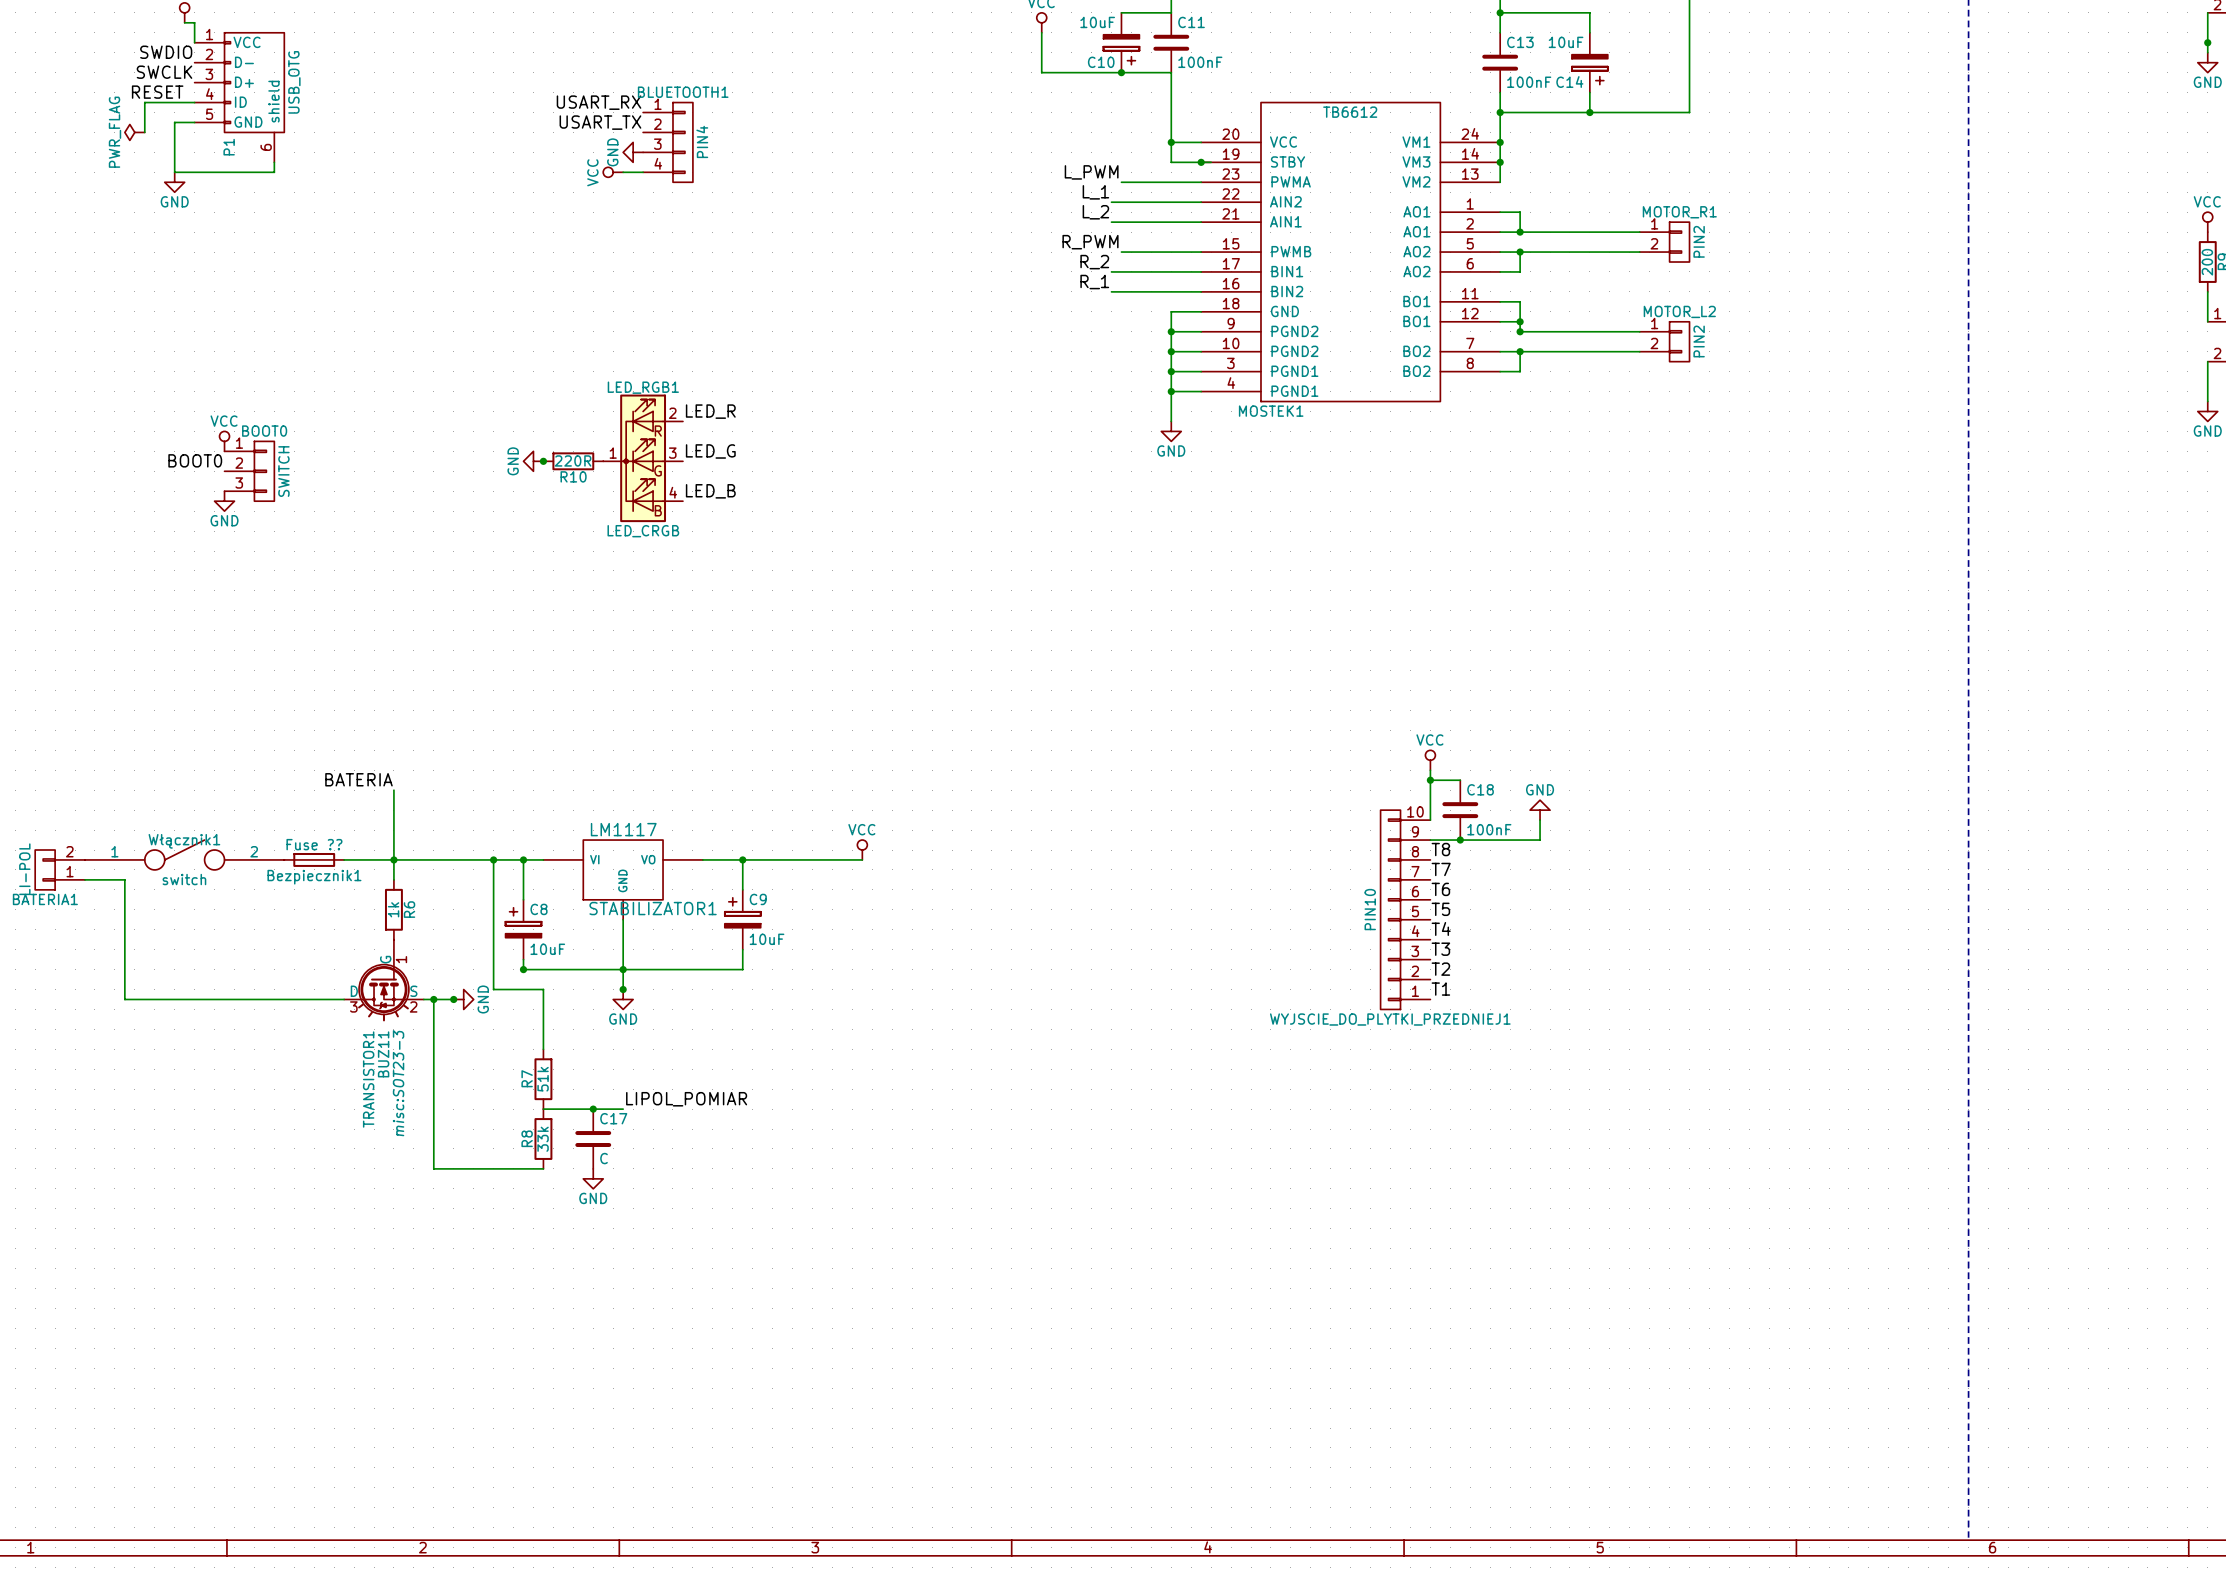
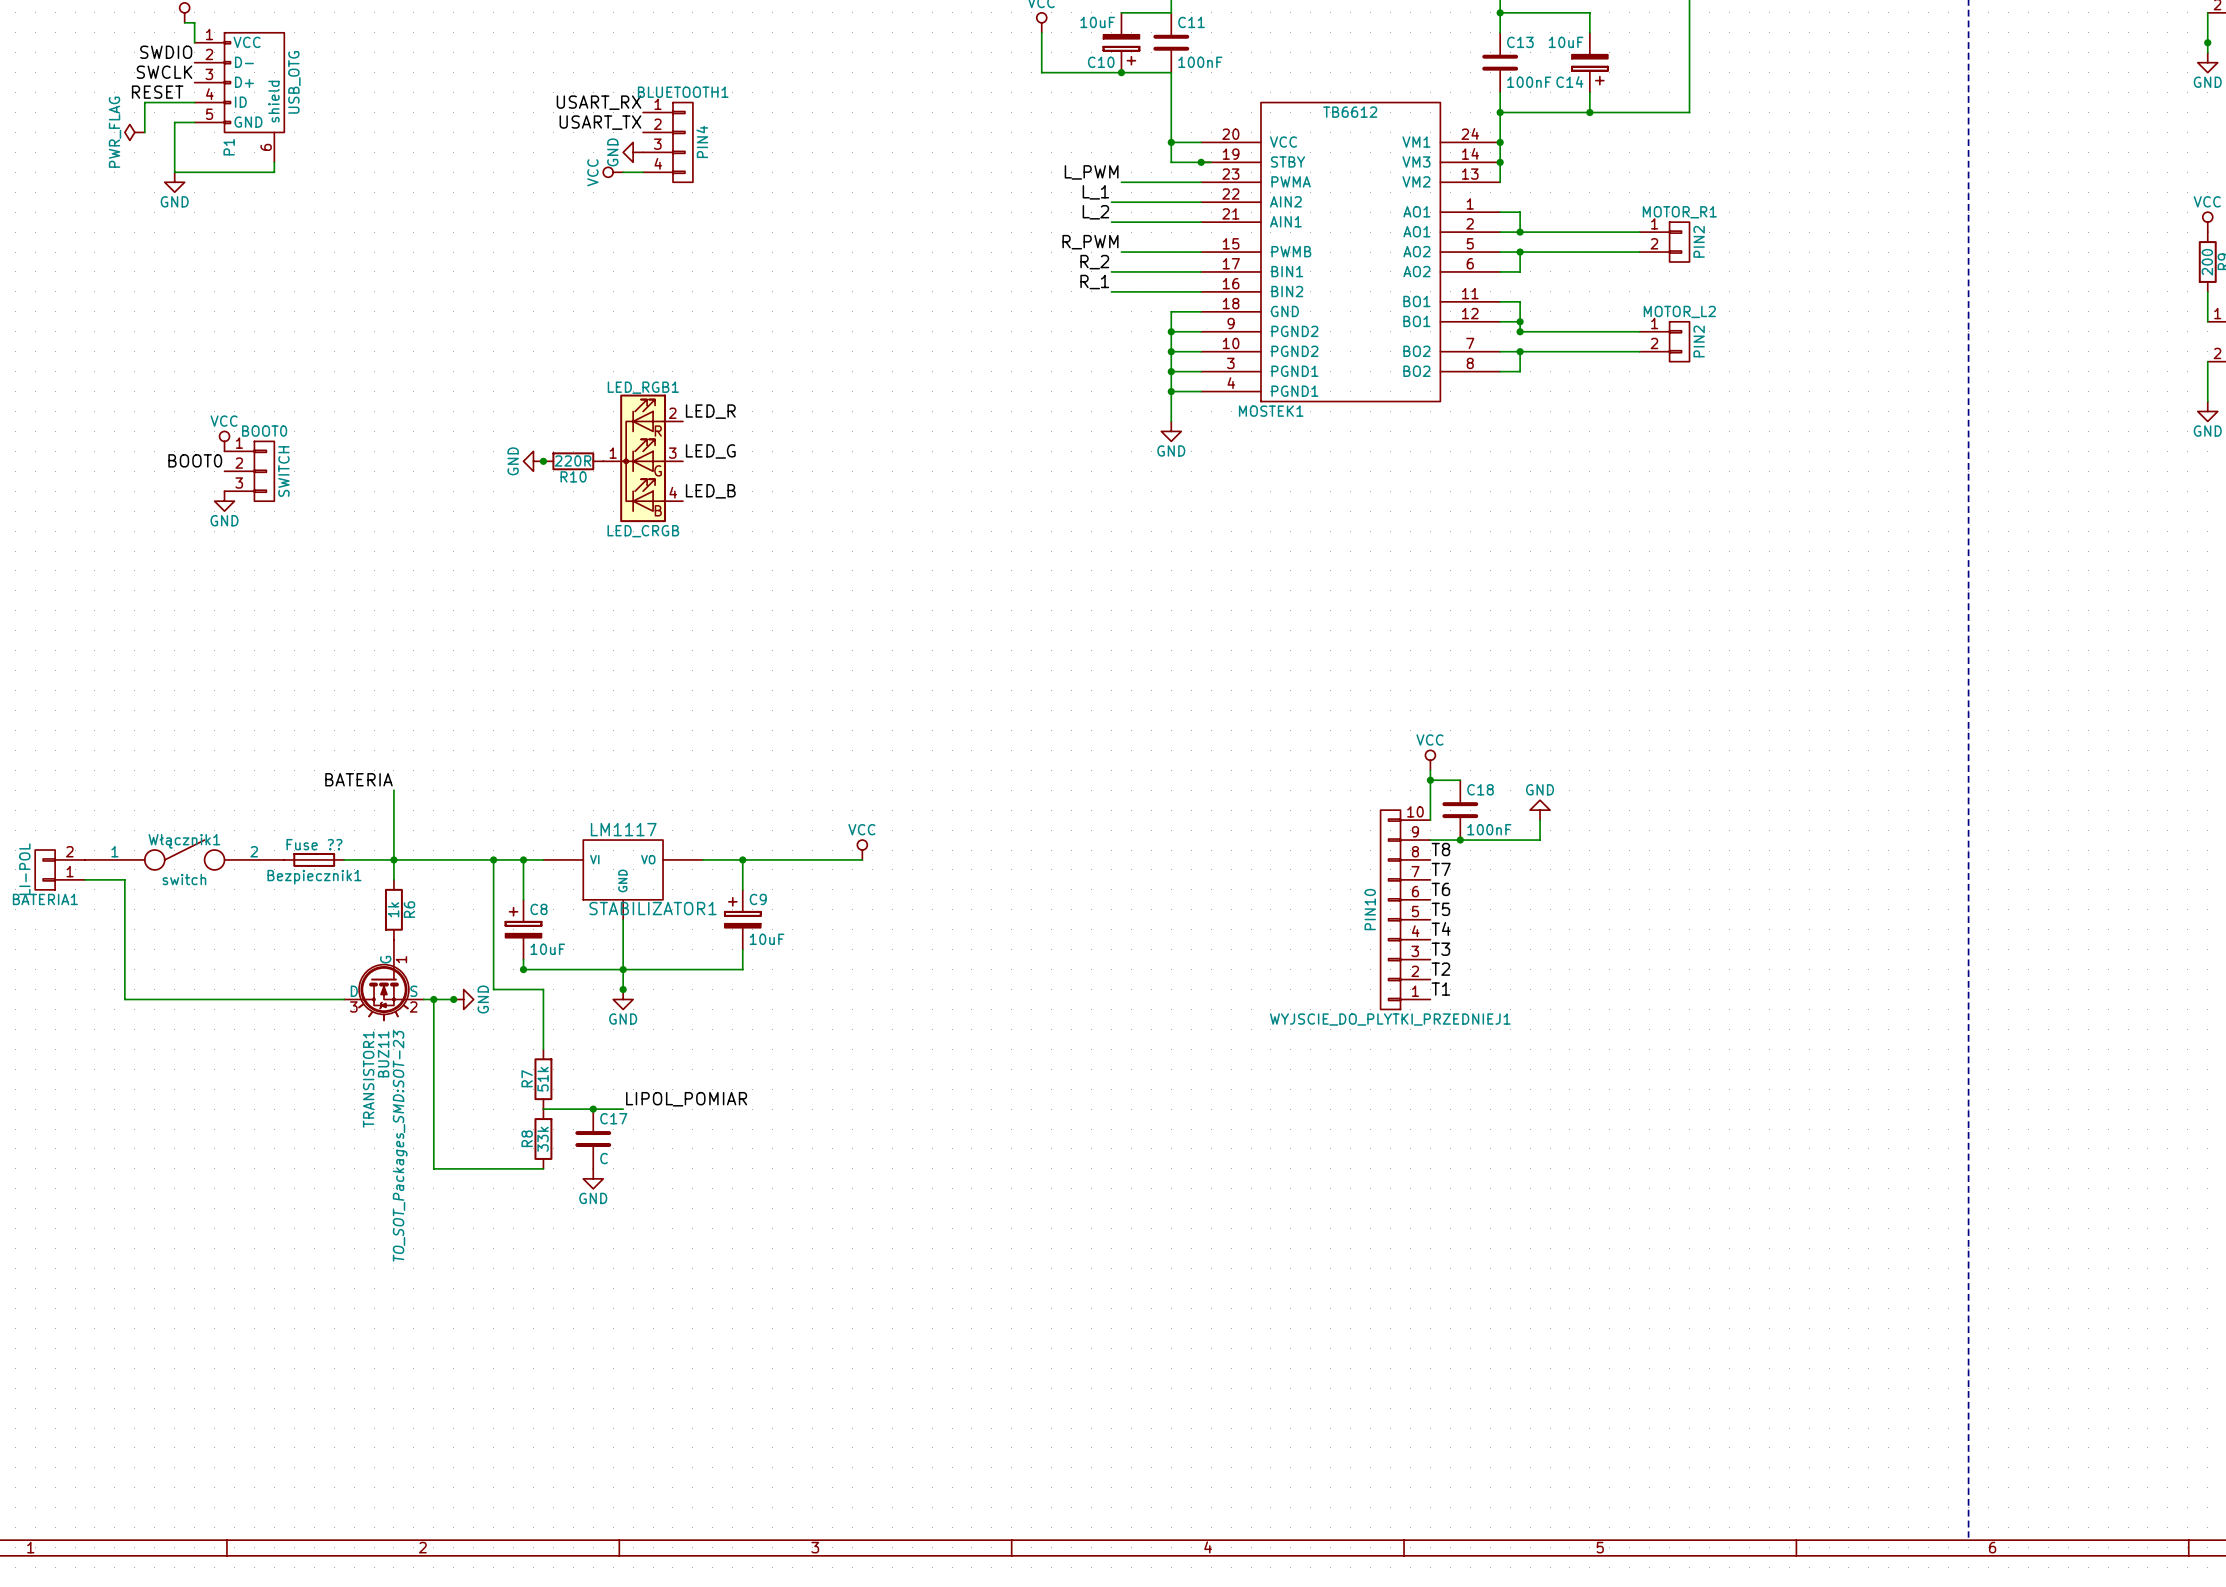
TRANSISTOR1 text: misc:SOT23-3 (398, 1083) -> TO_SOT_Packages_SMD:SOT-23 (400, 1145)

